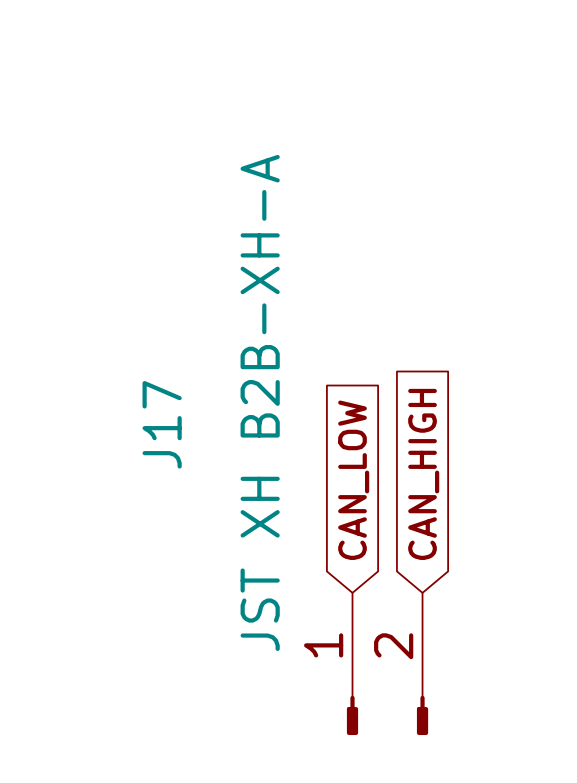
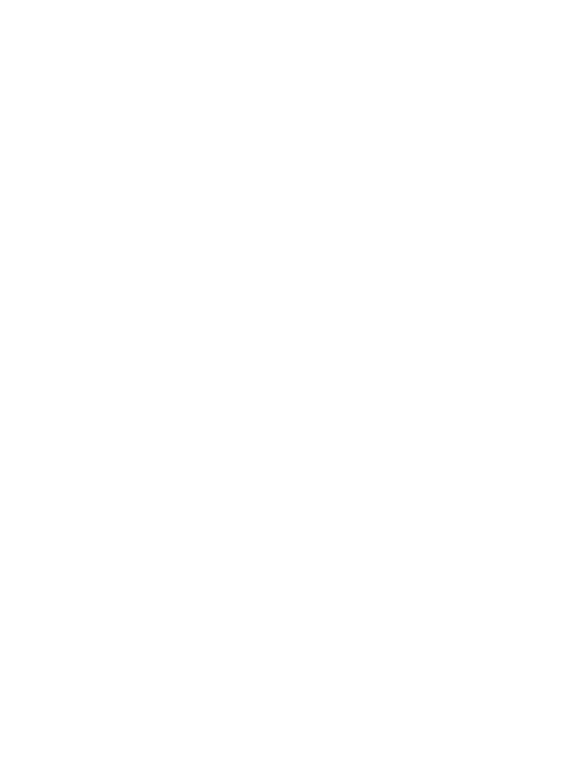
global label: CAN_HIGH (423, 474) -> none
global label: CAN_LOW (353, 480) -> none
J17: JST XH B2B-XH-A (387, 663) -> none

